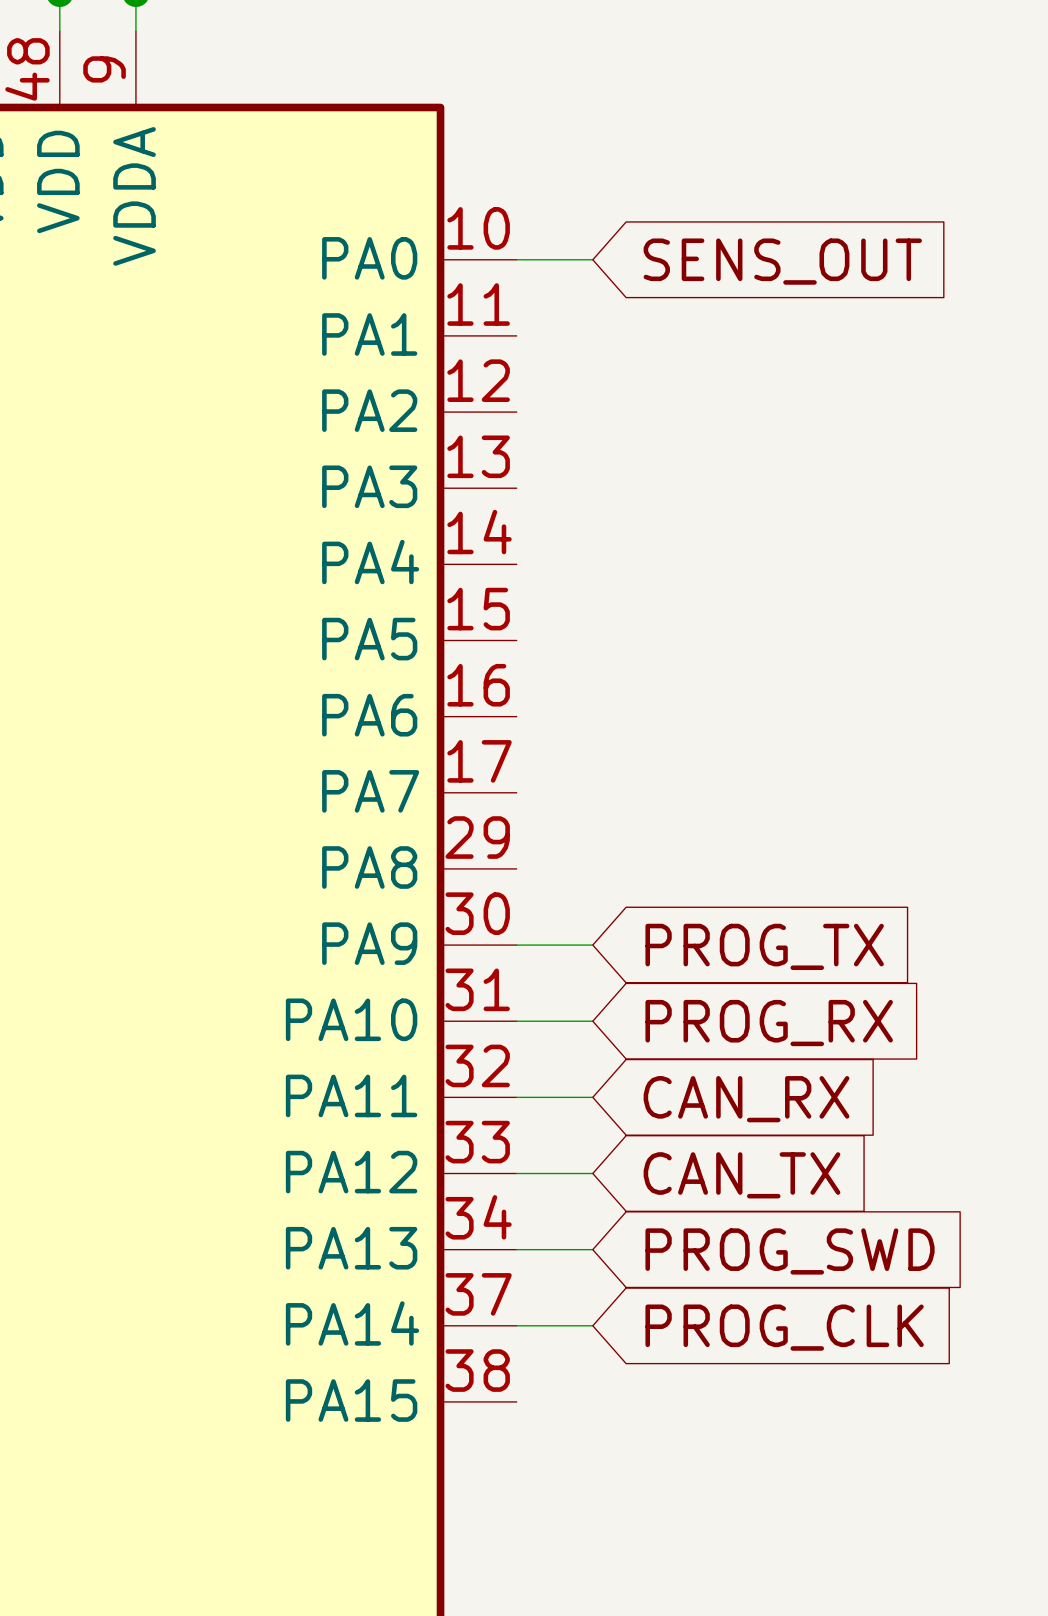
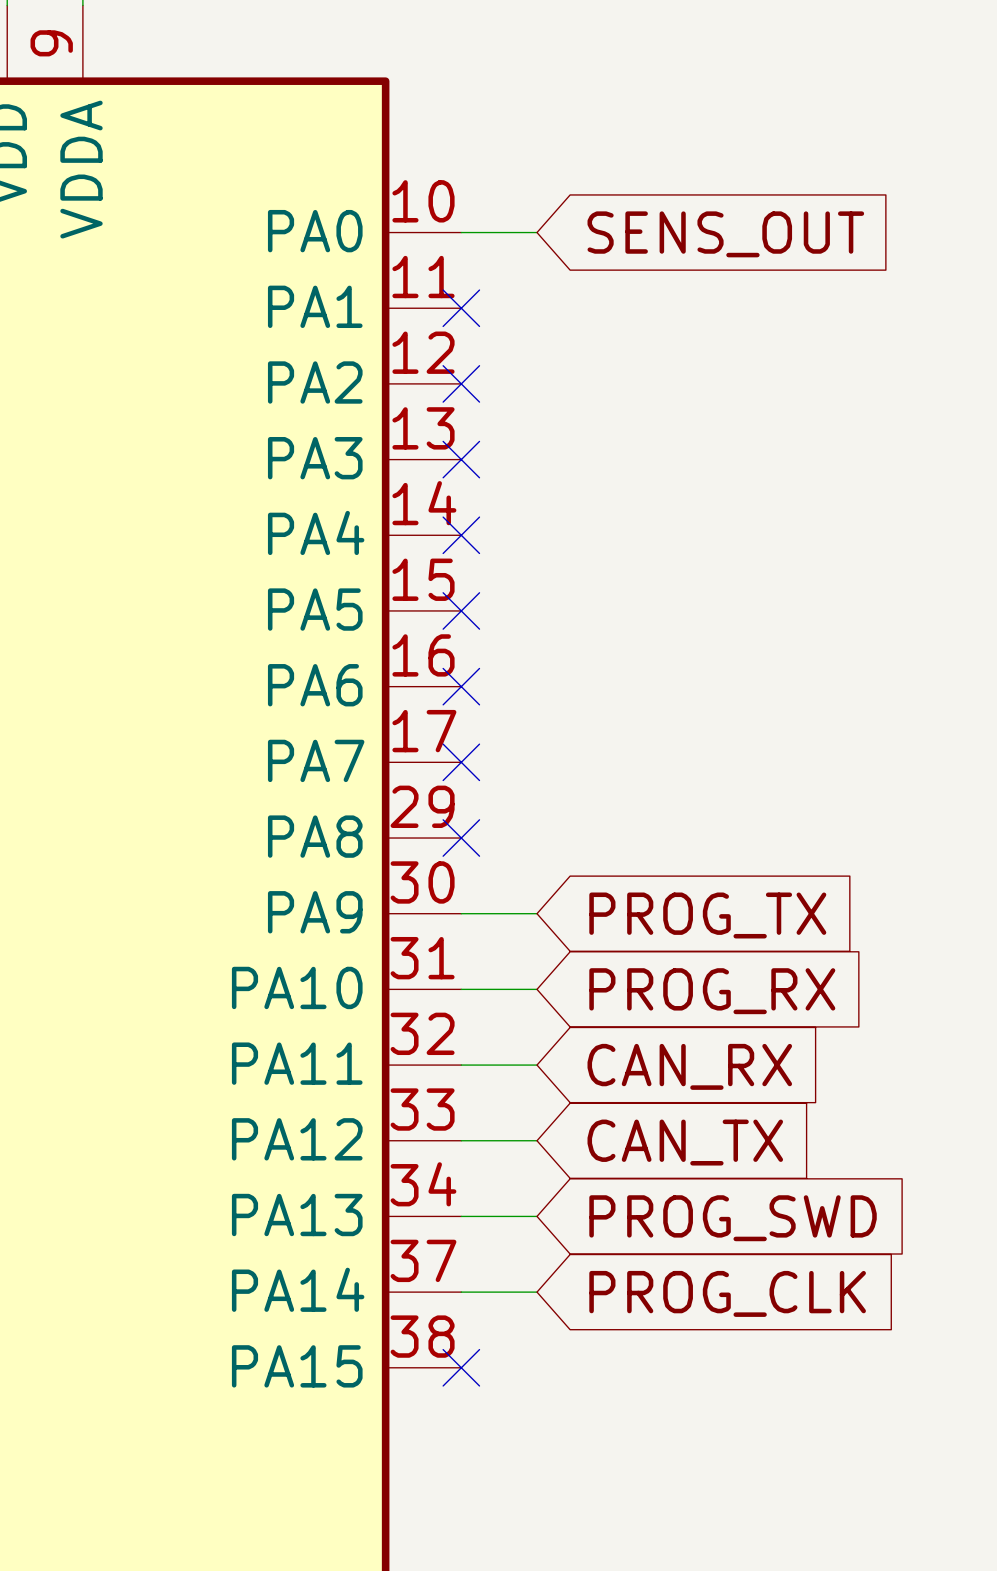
no-connect mark: none -> (461, 308)
no-connect mark: none -> (461, 383)
no-connect mark: none -> (461, 459)
no-connect mark: none -> (461, 535)
no-connect mark: none -> (461, 610)
no-connect mark: none -> (461, 686)
no-connect mark: none -> (461, 762)
no-connect mark: none -> (461, 838)
no-connect mark: none -> (461, 1367)

